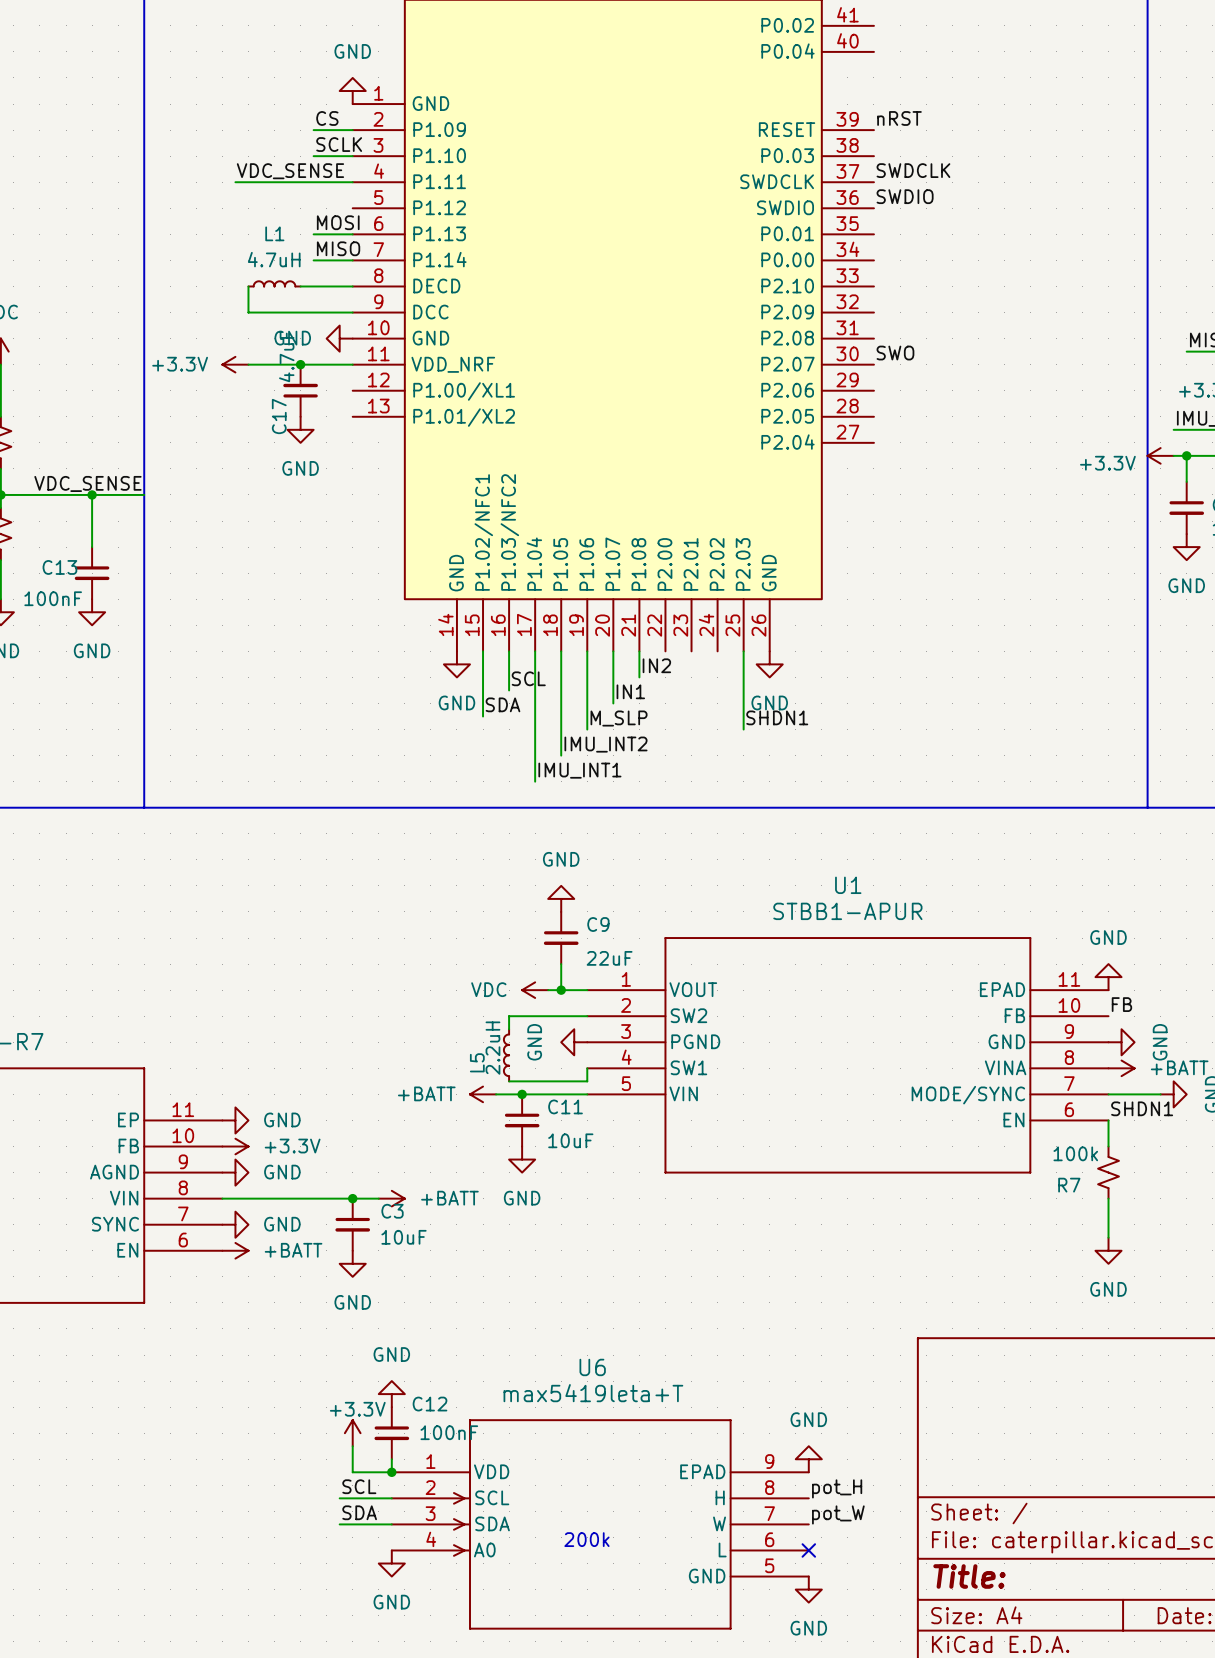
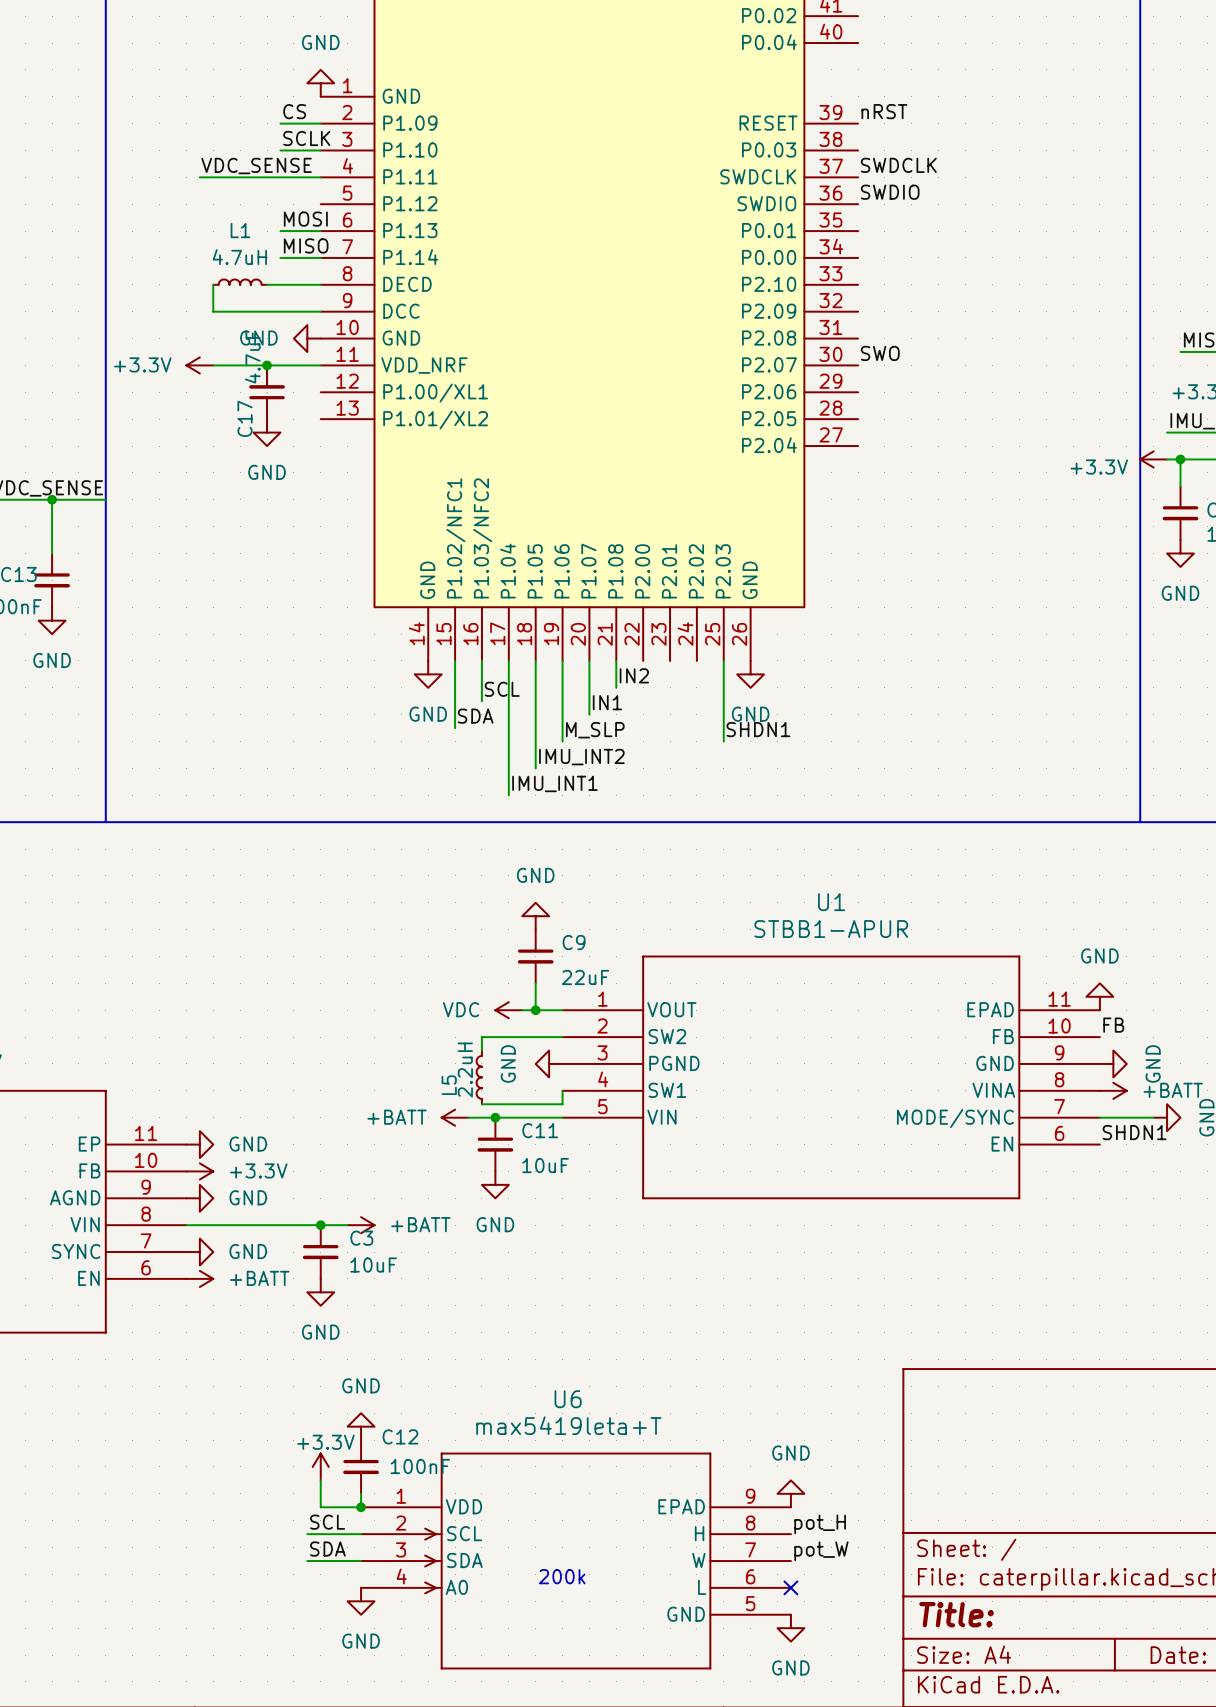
wire: (1108, 1120) (1108, 1146) -> none
R7: 100k (1108, 1172) -> none
wire: (1108, 1198) (1108, 1237) -> none
power symbol: GND (1108, 1250) -> none

